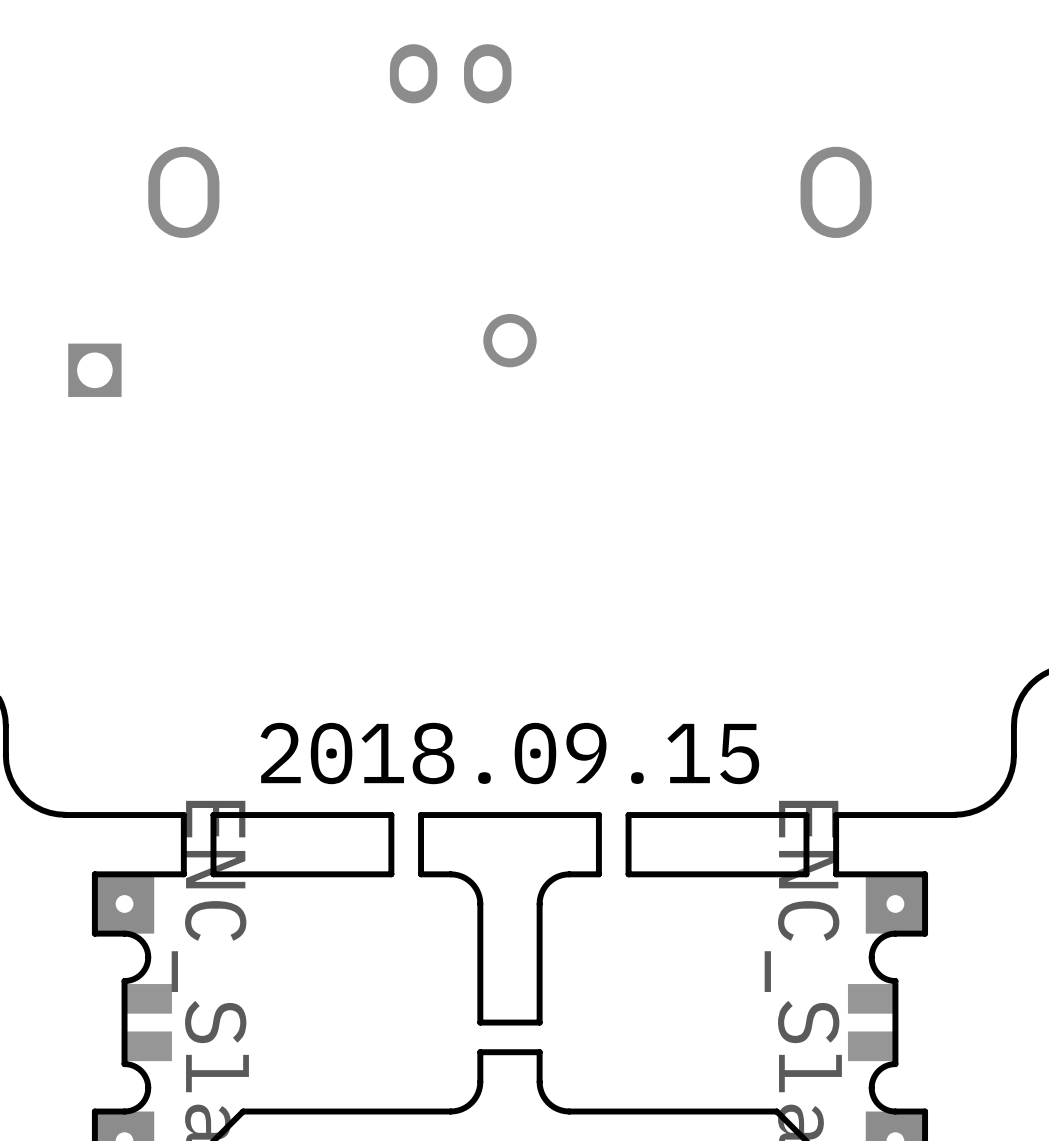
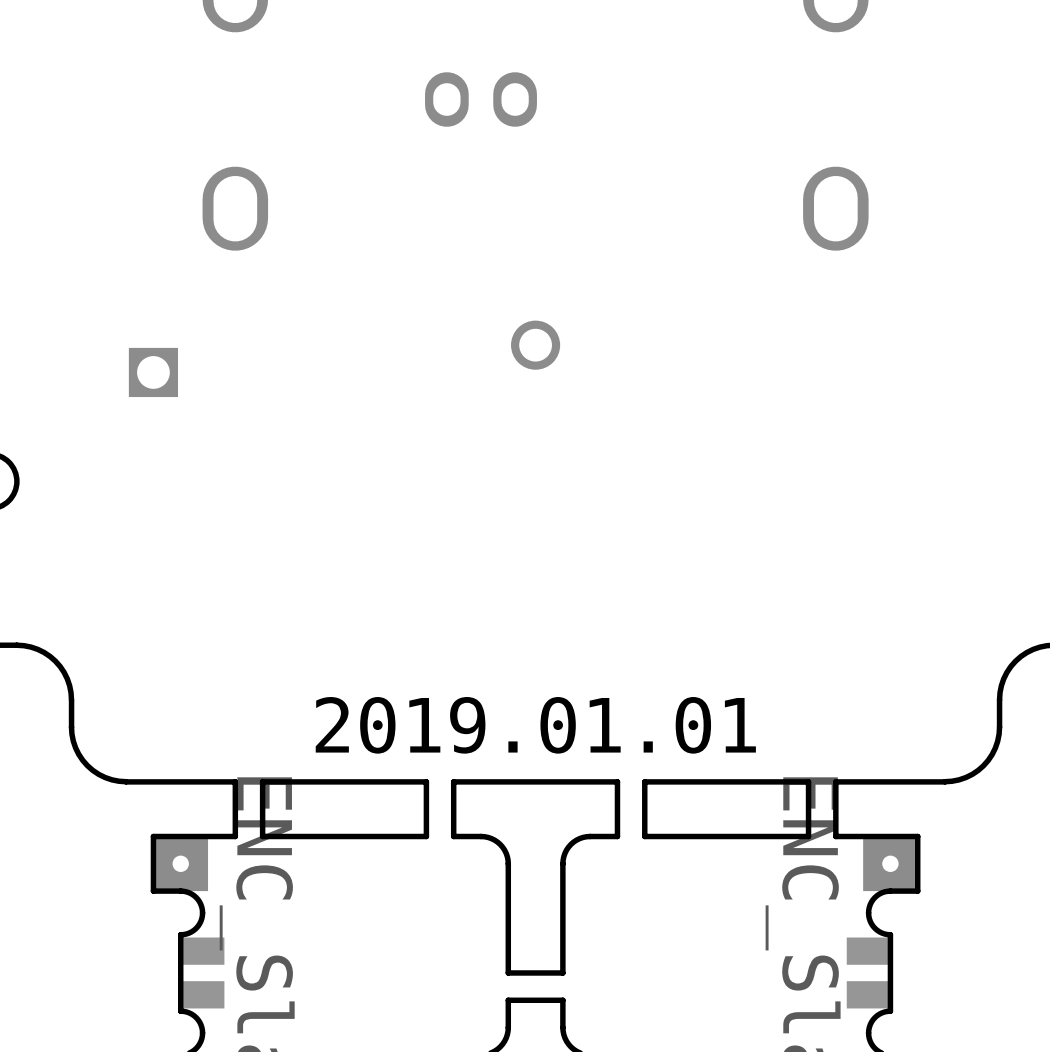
text: 2018.09.15 (509, 753) -> 2019.01.01 (535, 725)

